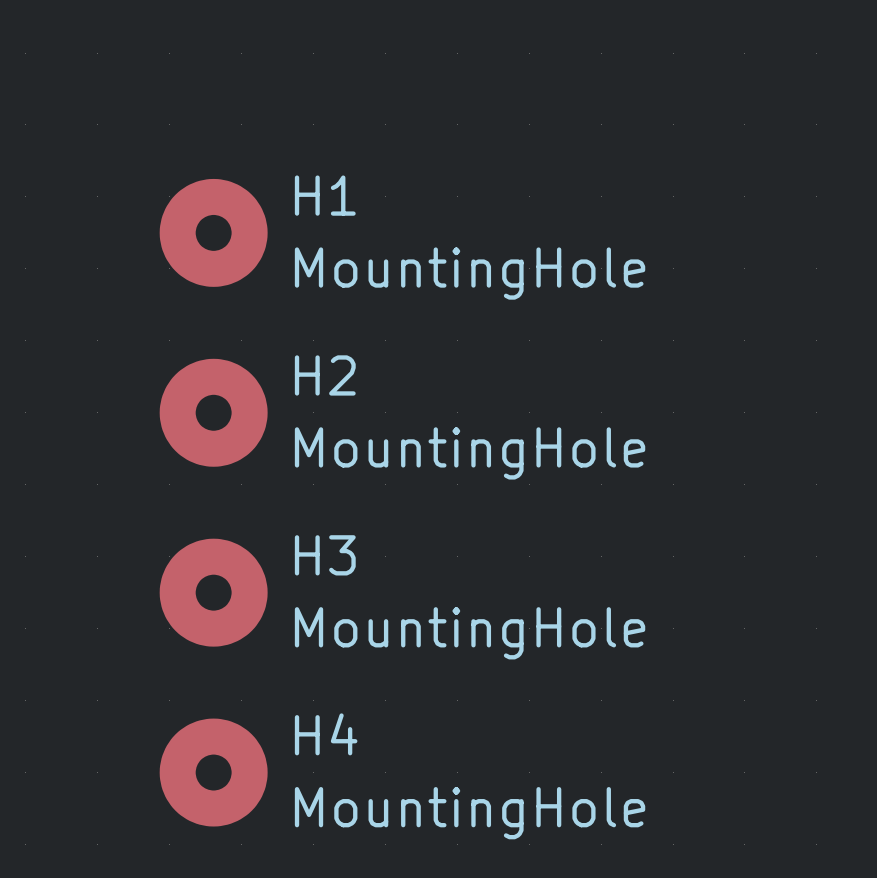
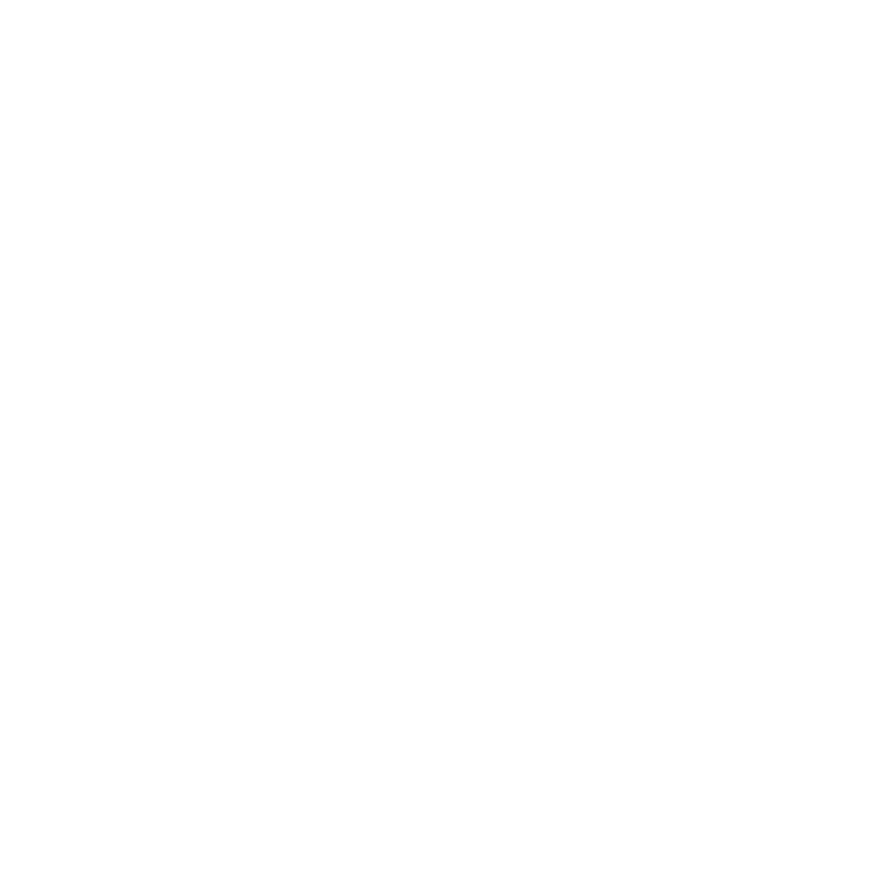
H1: MountingHole (213, 232) -> none
H2: MountingHole (213, 412) -> none
H3: MountingHole (213, 592) -> none
H4: MountingHole (213, 772) -> none

